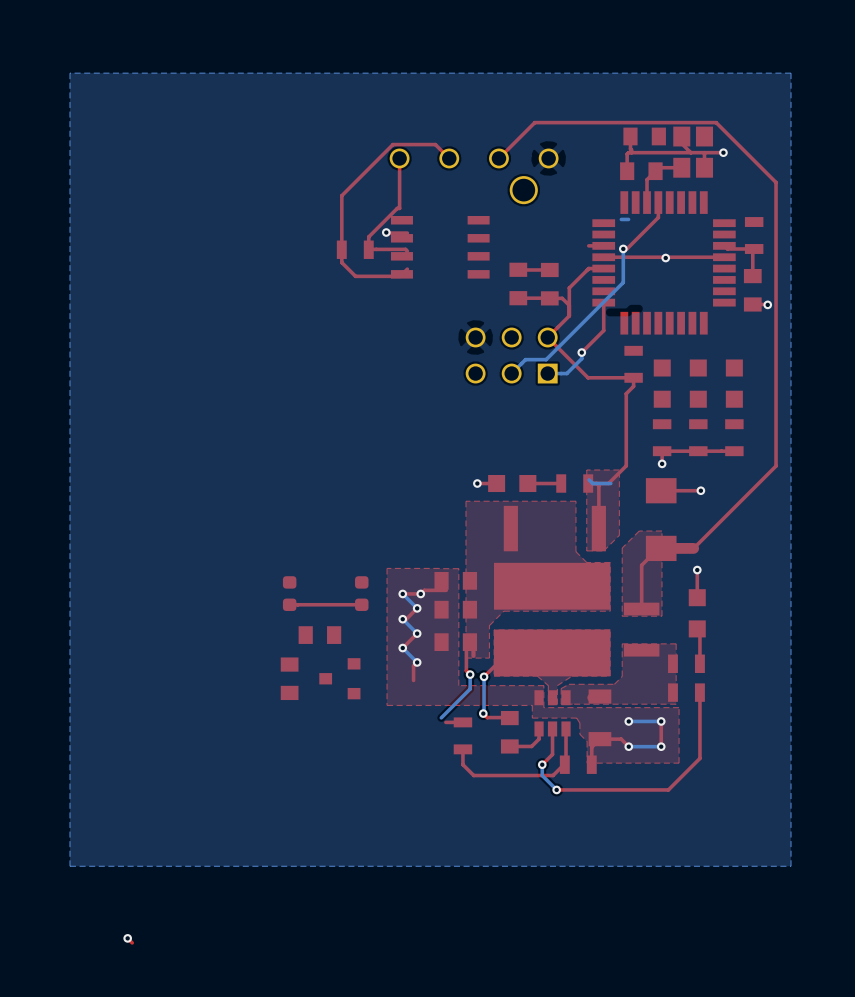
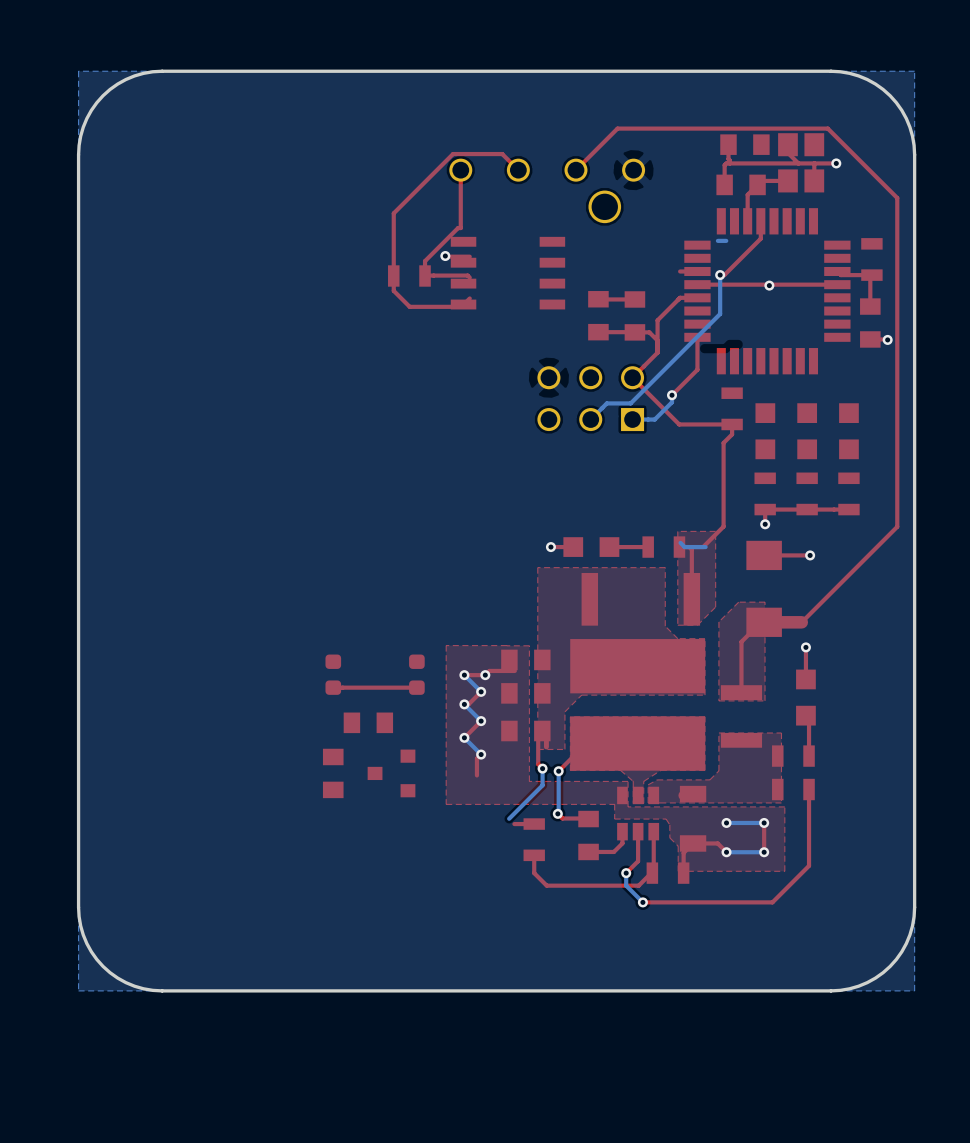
board edge: none -> (831, 71) (162, 71) (143, 73) (125, 79) (110, 89) (96, 102) (83, 127) (78, 154) (78, 907) (80, 925) (86, 943) (96, 959) (110, 972) (134, 986) (162, 990) (831, 990) (849, 988) (867, 982) (883, 972) (896, 959) (909, 934) (914, 907) (914, 145) (906, 118) (890, 95) (875, 84) (858, 75) (831, 71)
top track: (127, 938) (132, 942) -> none
via: (127, 938) -> none

